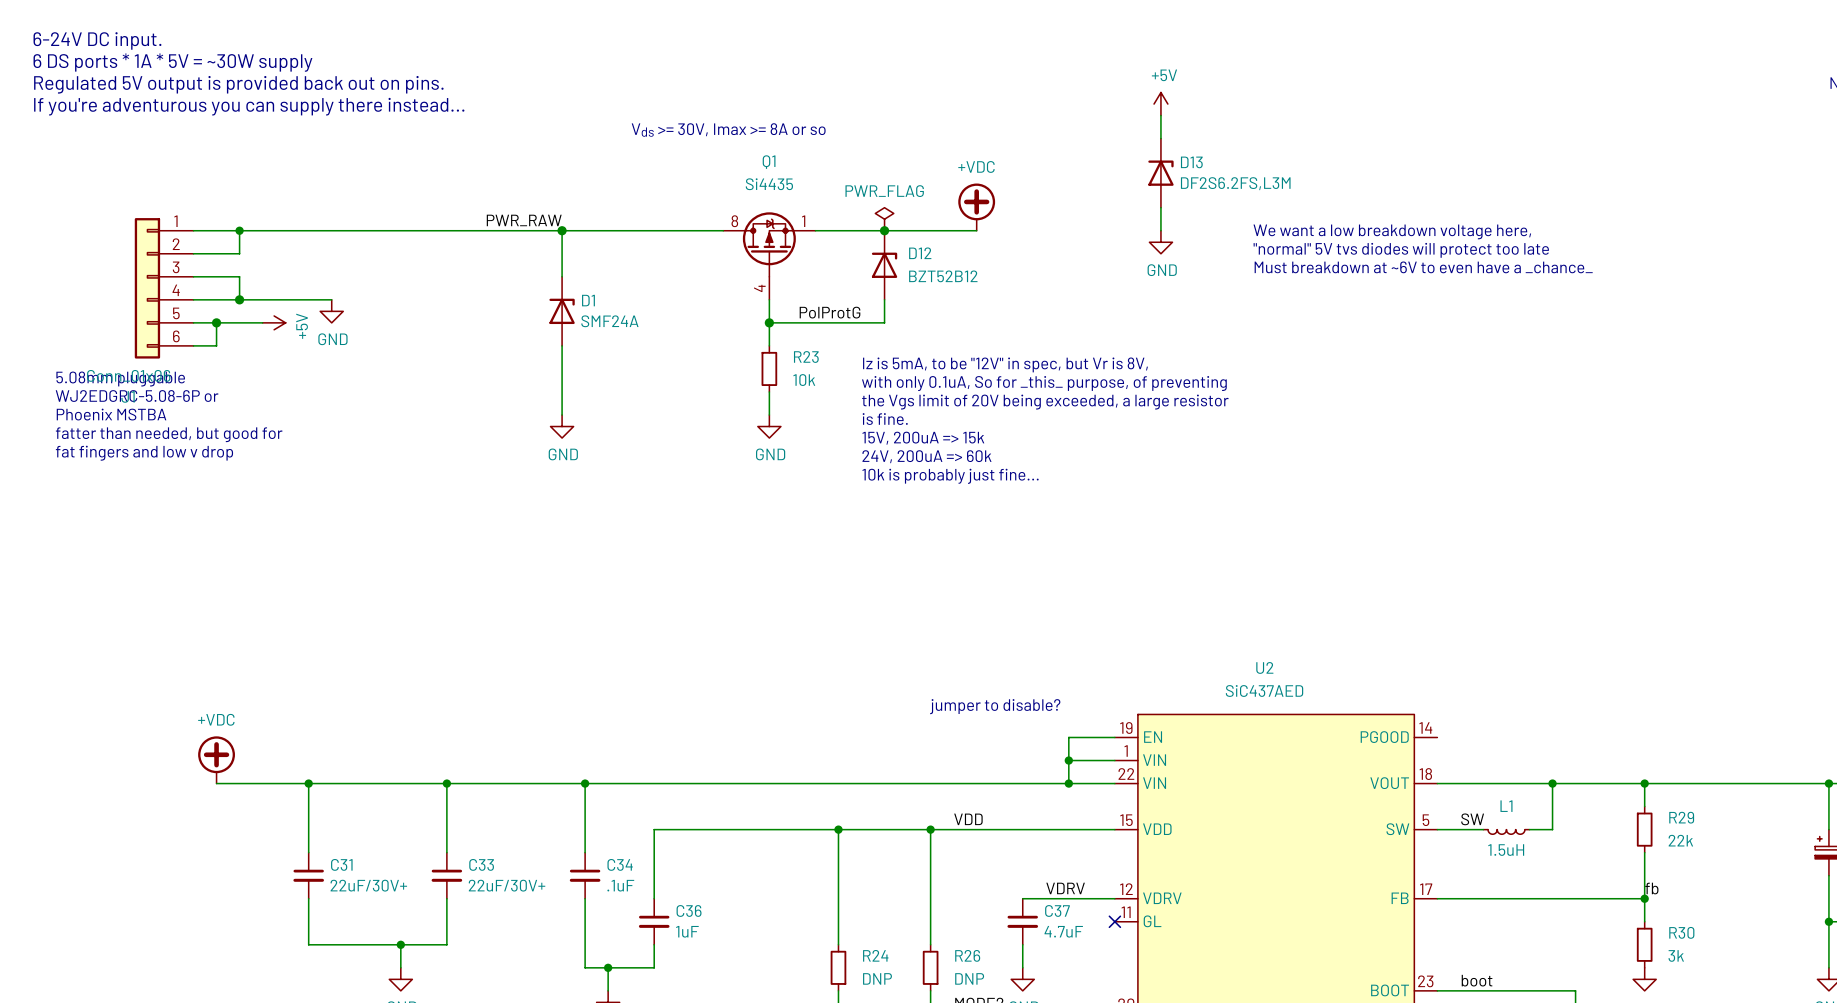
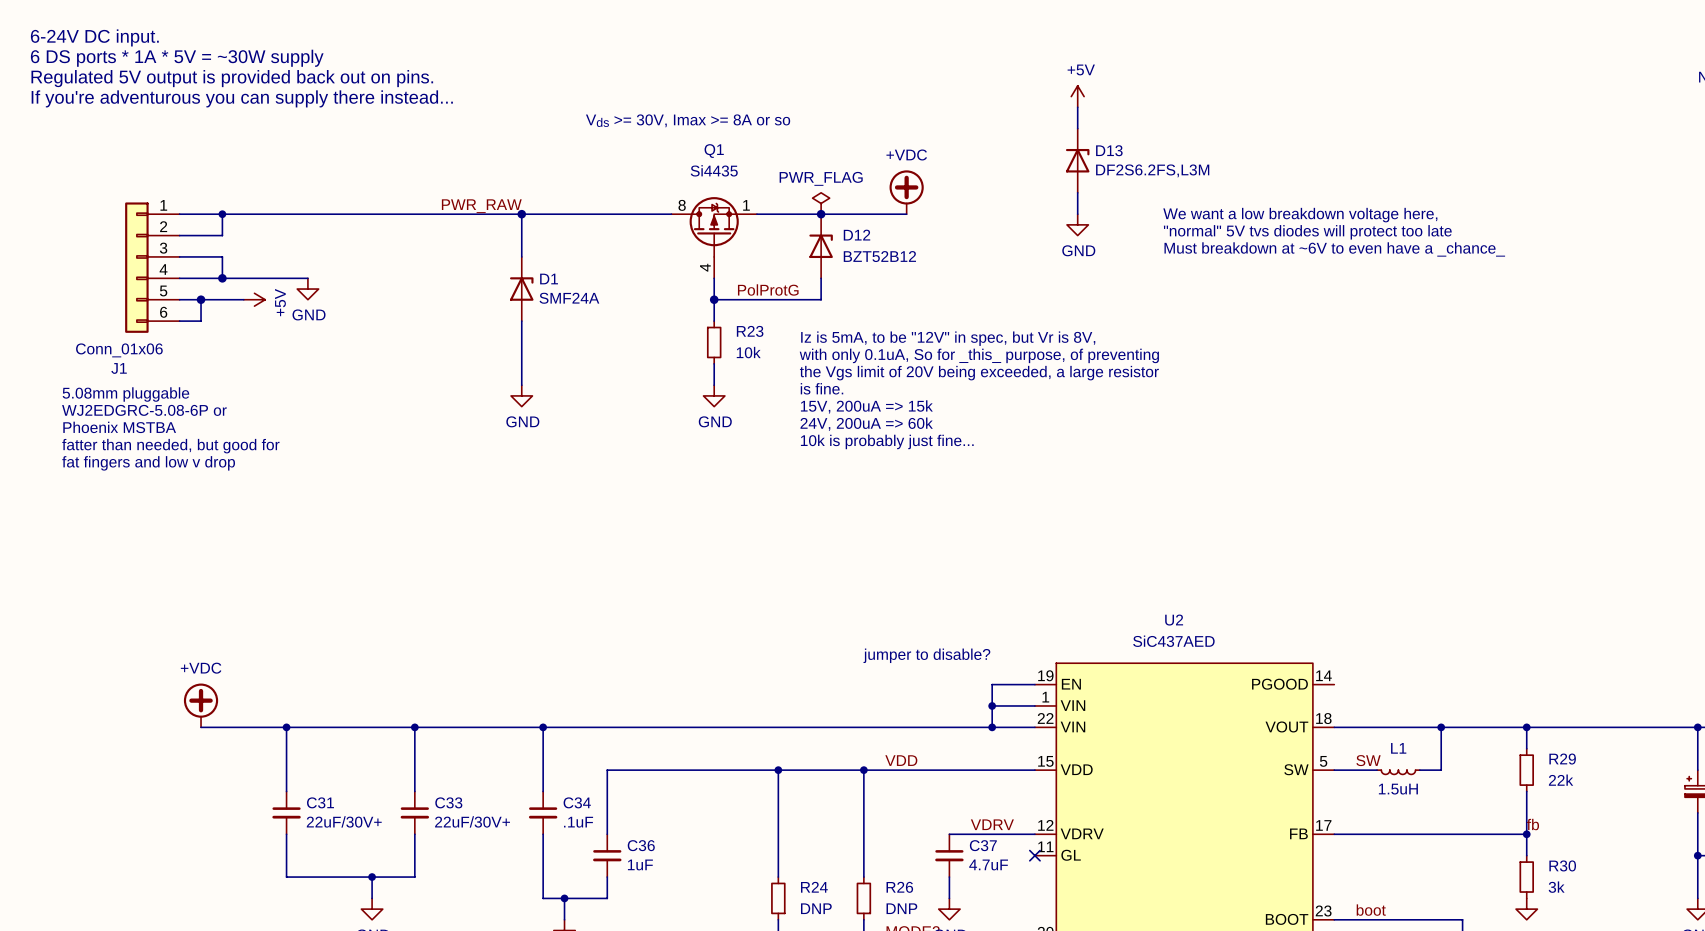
text position: 5.08mm pluggable (120, 379) -> 5.08mm pluggable (125, 394)
text position: WJ2EDGRC-5.08-6P or (137, 396) -> WJ2EDGRC-5.08-6P or (144, 410)
text position: Phoenix MSTBA (111, 414) -> Phoenix MSTBA (119, 427)
text position: fatter than needed, but good for (169, 434) -> fatter than needed, but good for (170, 446)
text position: fat fingers and low v drop (144, 453) -> fat fingers and low v drop (148, 463)

